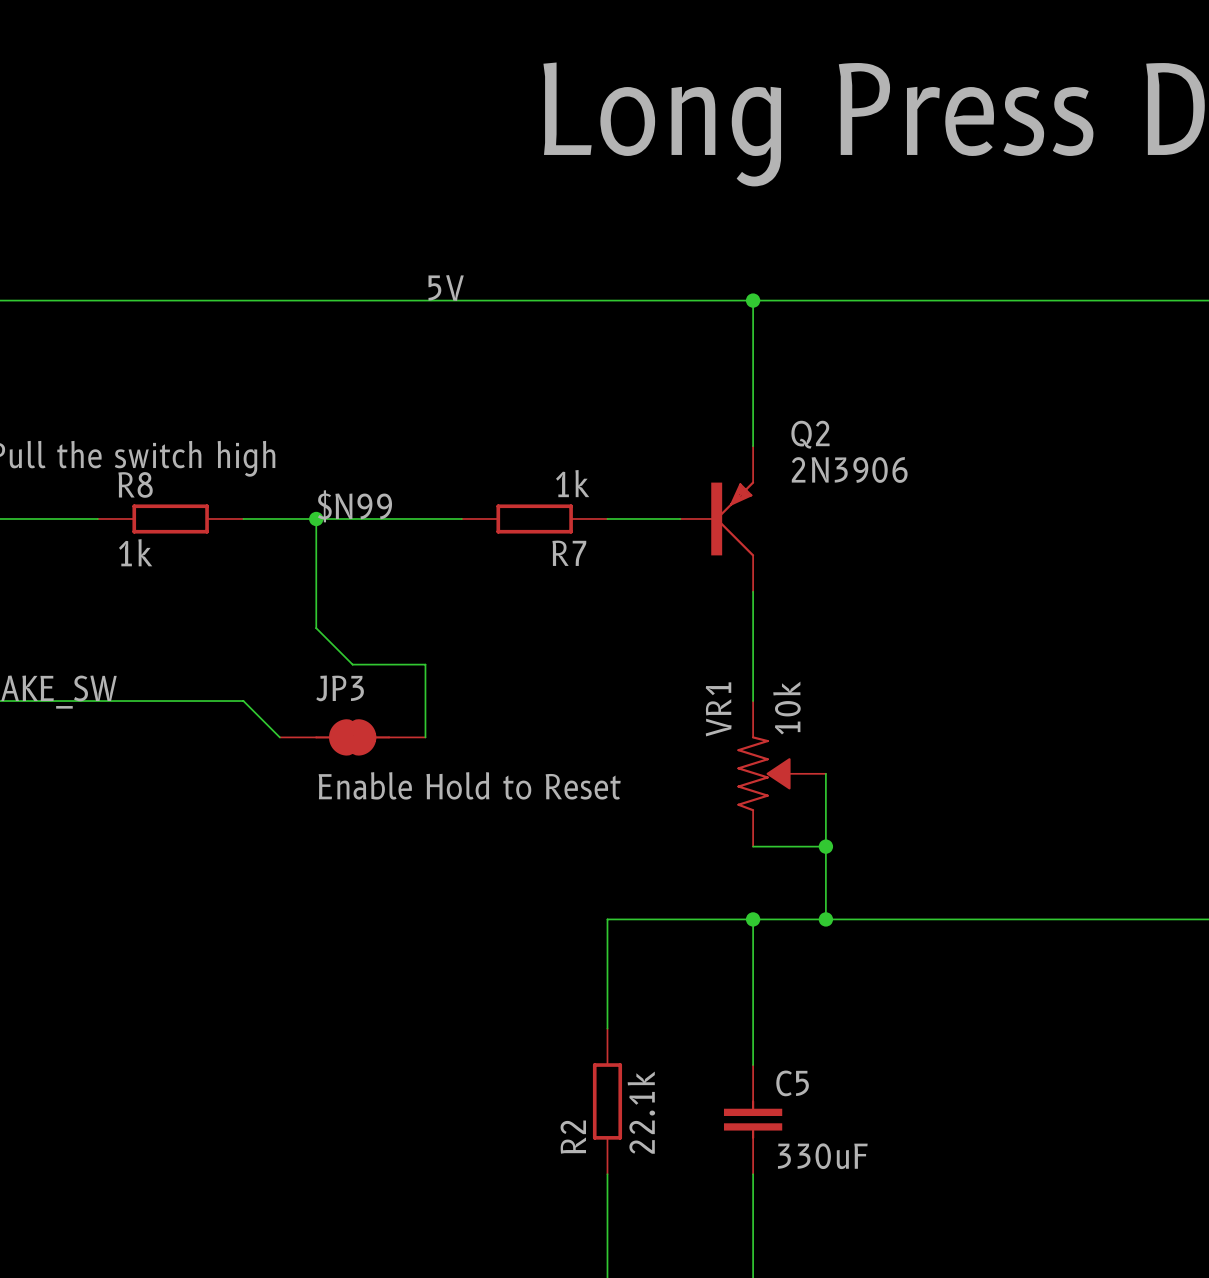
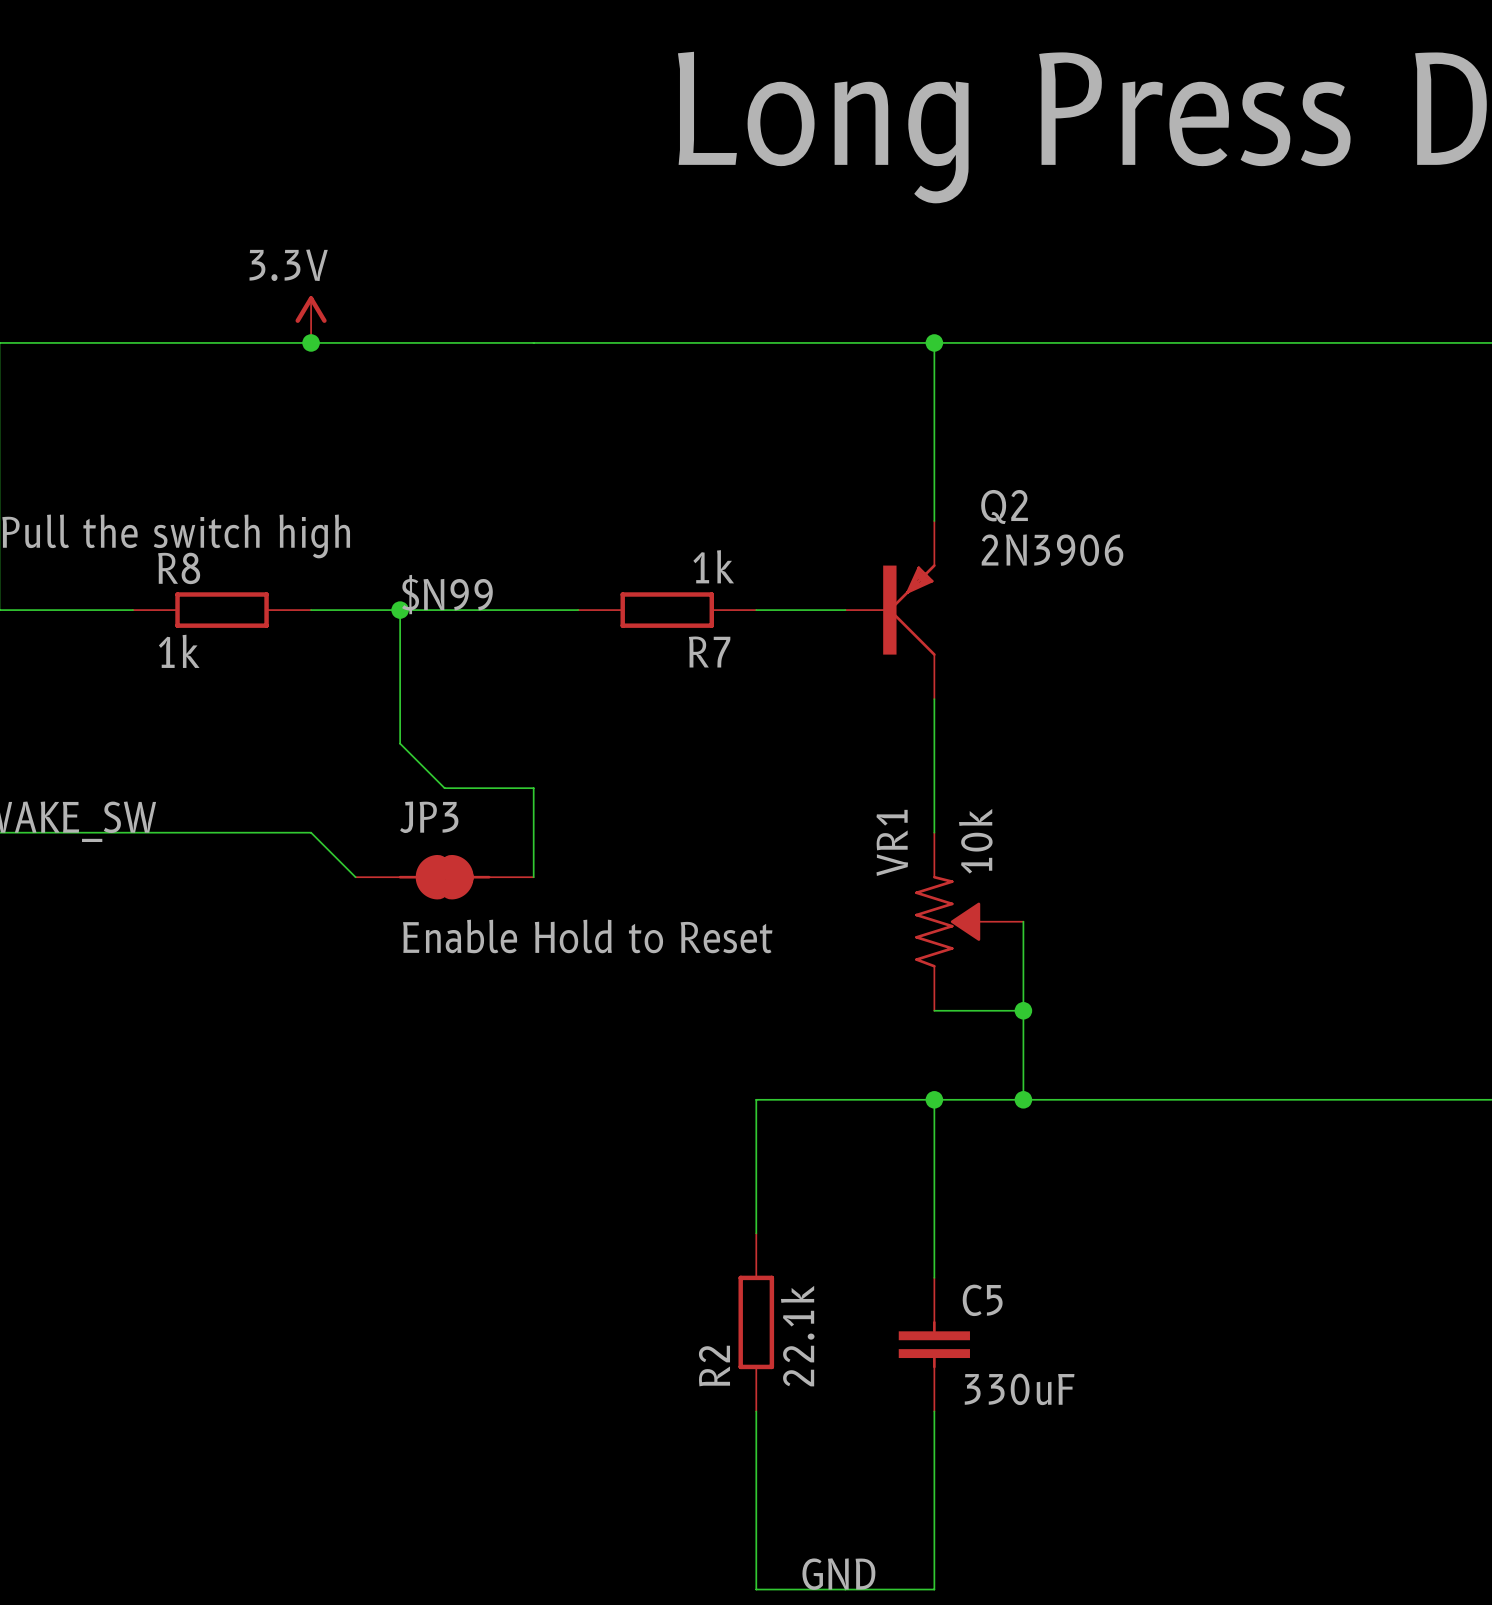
power symbol: none -> 3.3V (311, 319)
label: 5V (446, 288) -> none
junction: none -> (311, 342)

